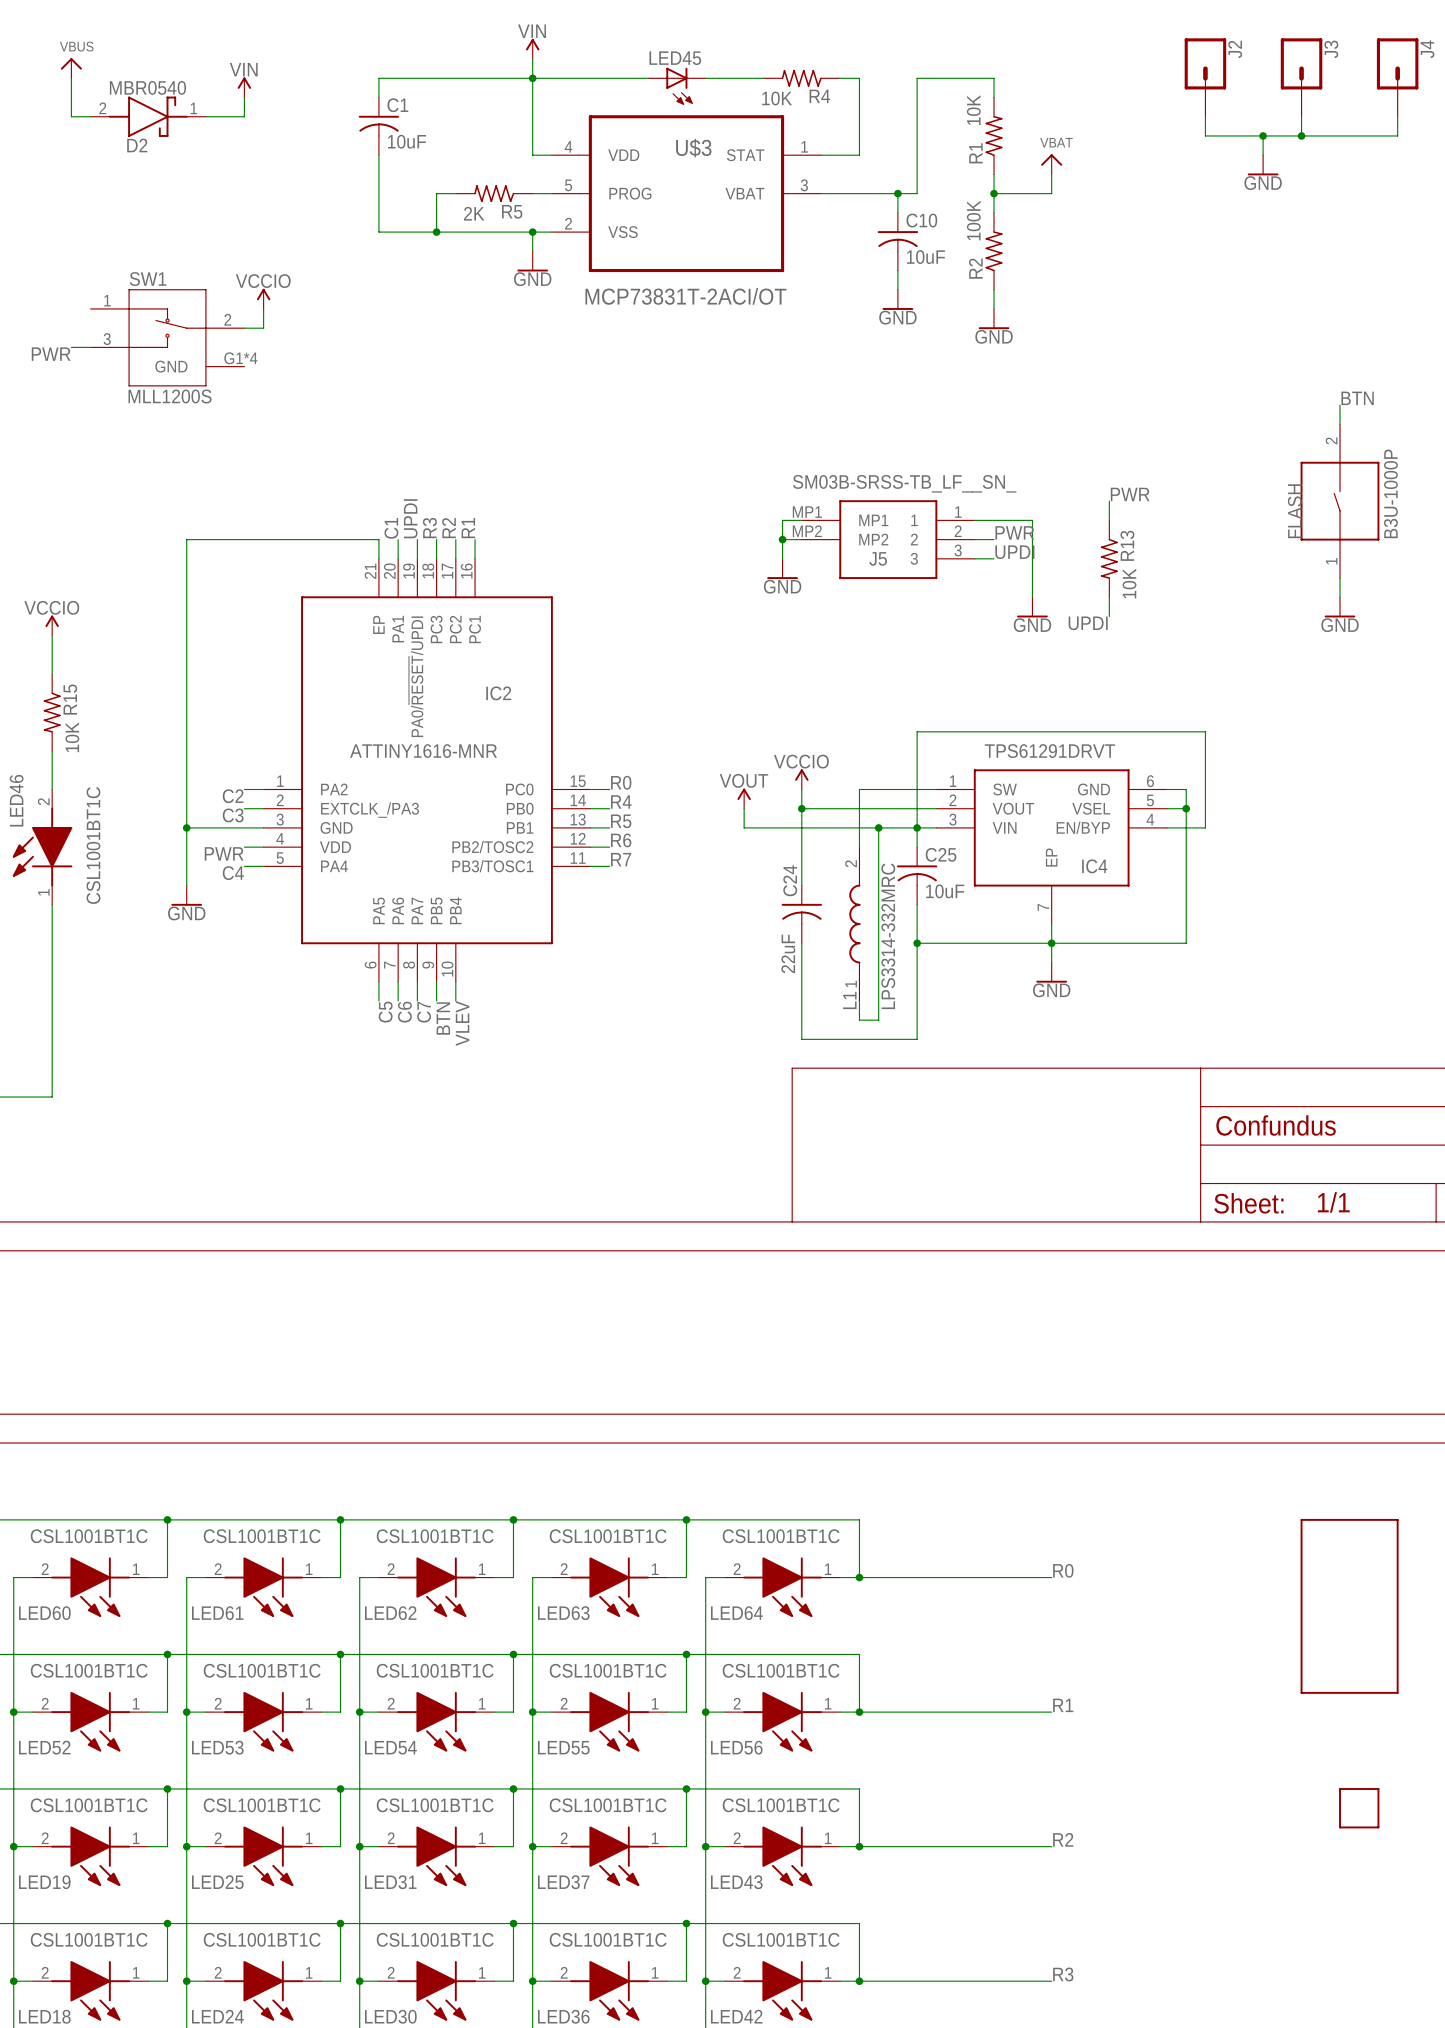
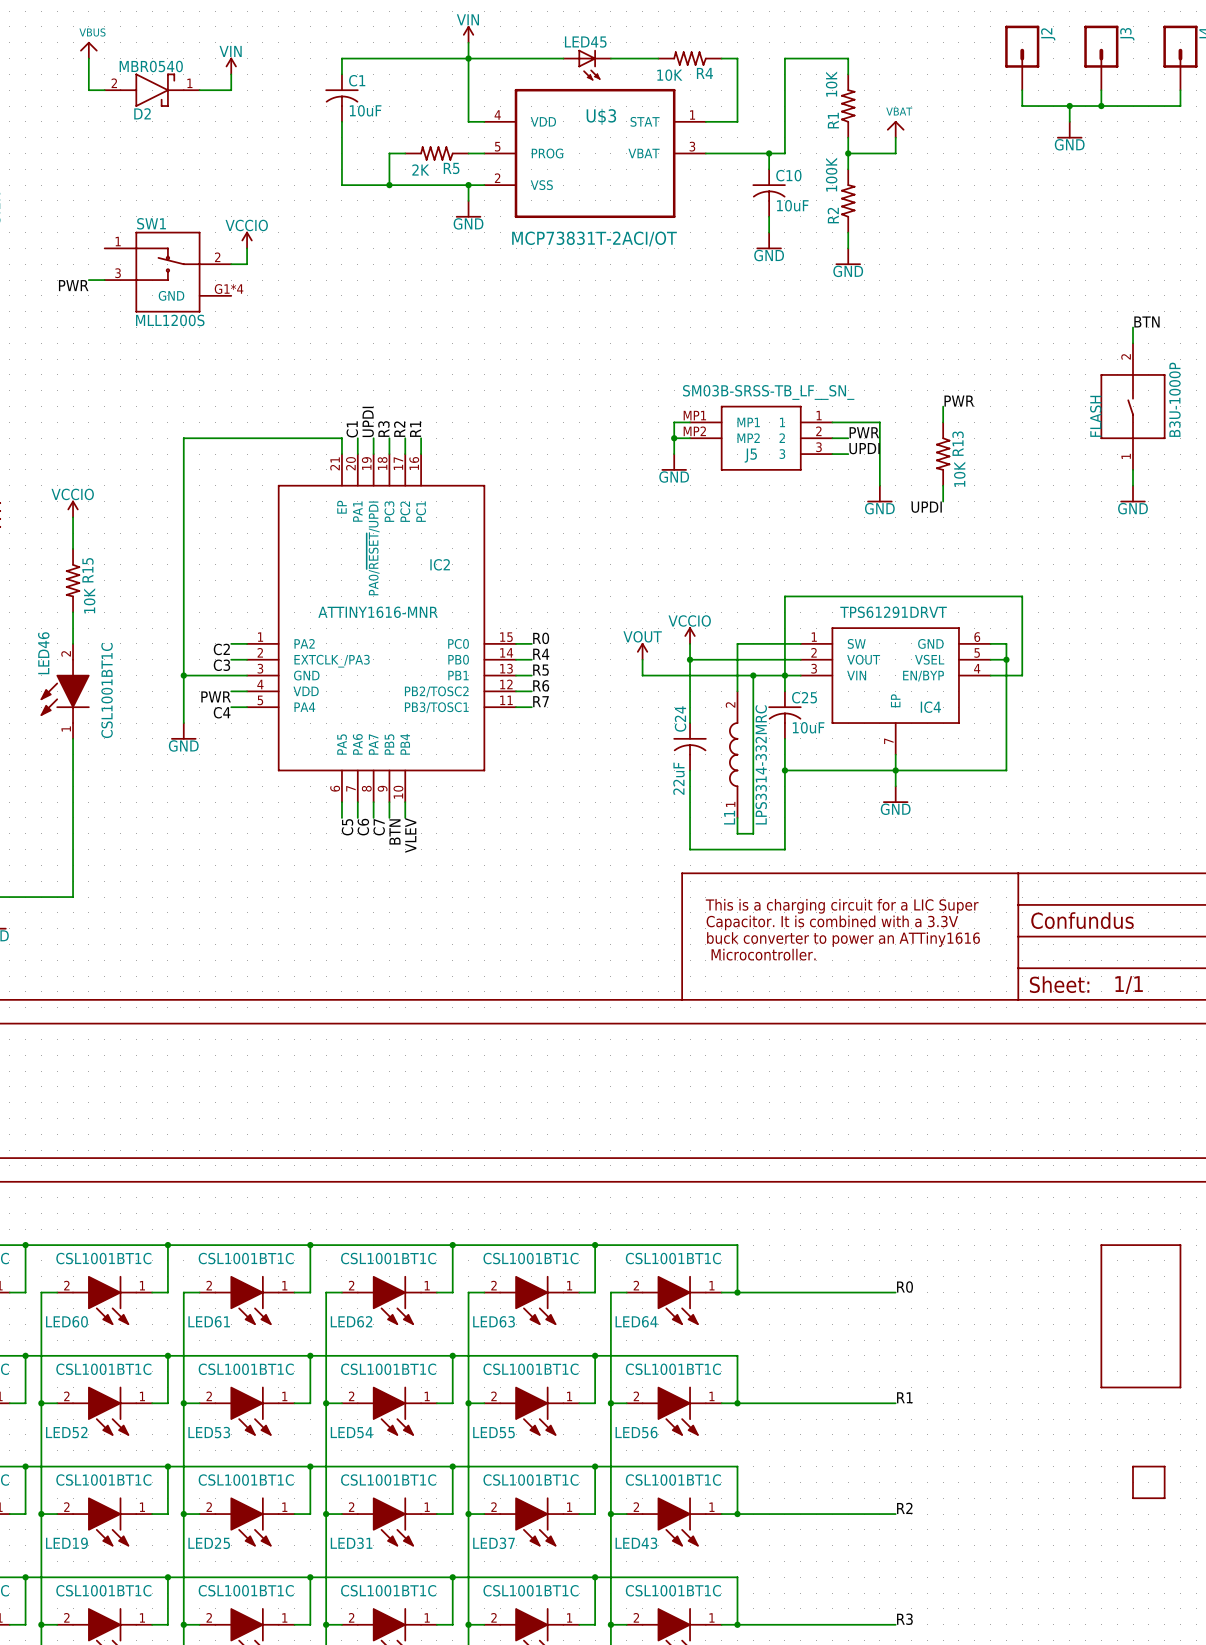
text: none -> This is a charging circuit for a LIC Super (842, 906)
text: none -> Capacitor. It is combined with a 3.3V (832, 922)
text: none -> buck converter to power an ATTiny1616 (843, 939)
text: none -> Microcontroller. (763, 954)

